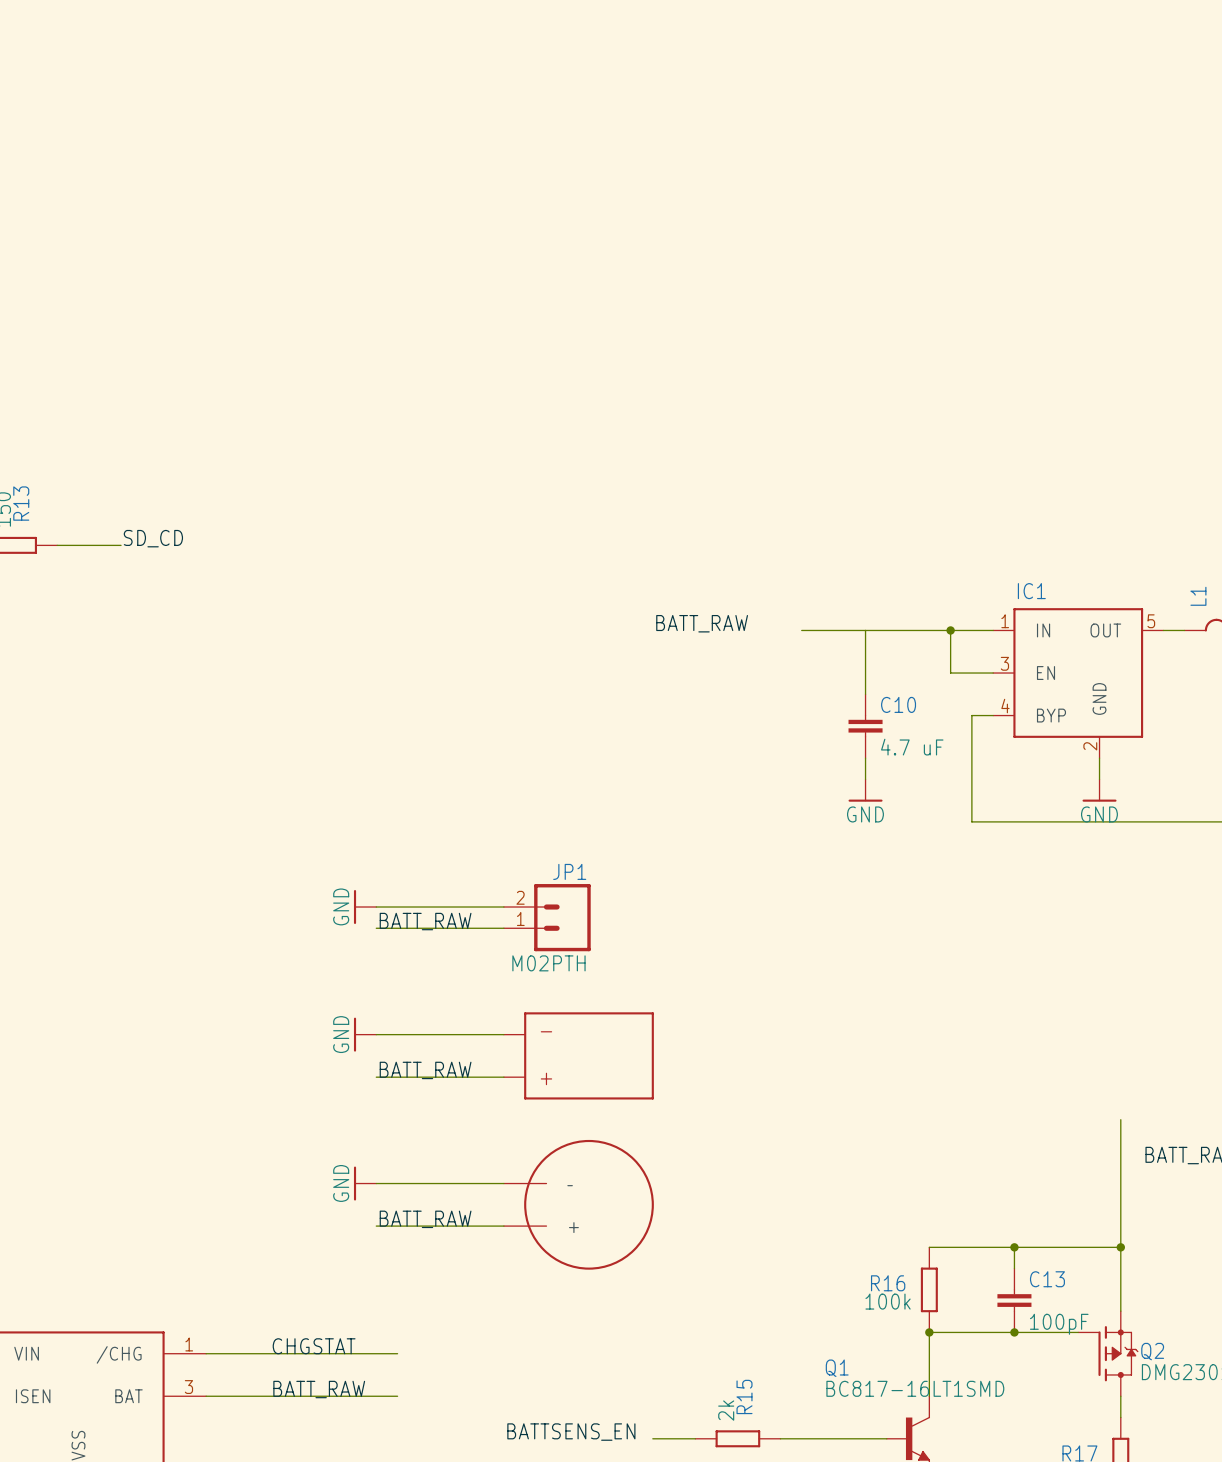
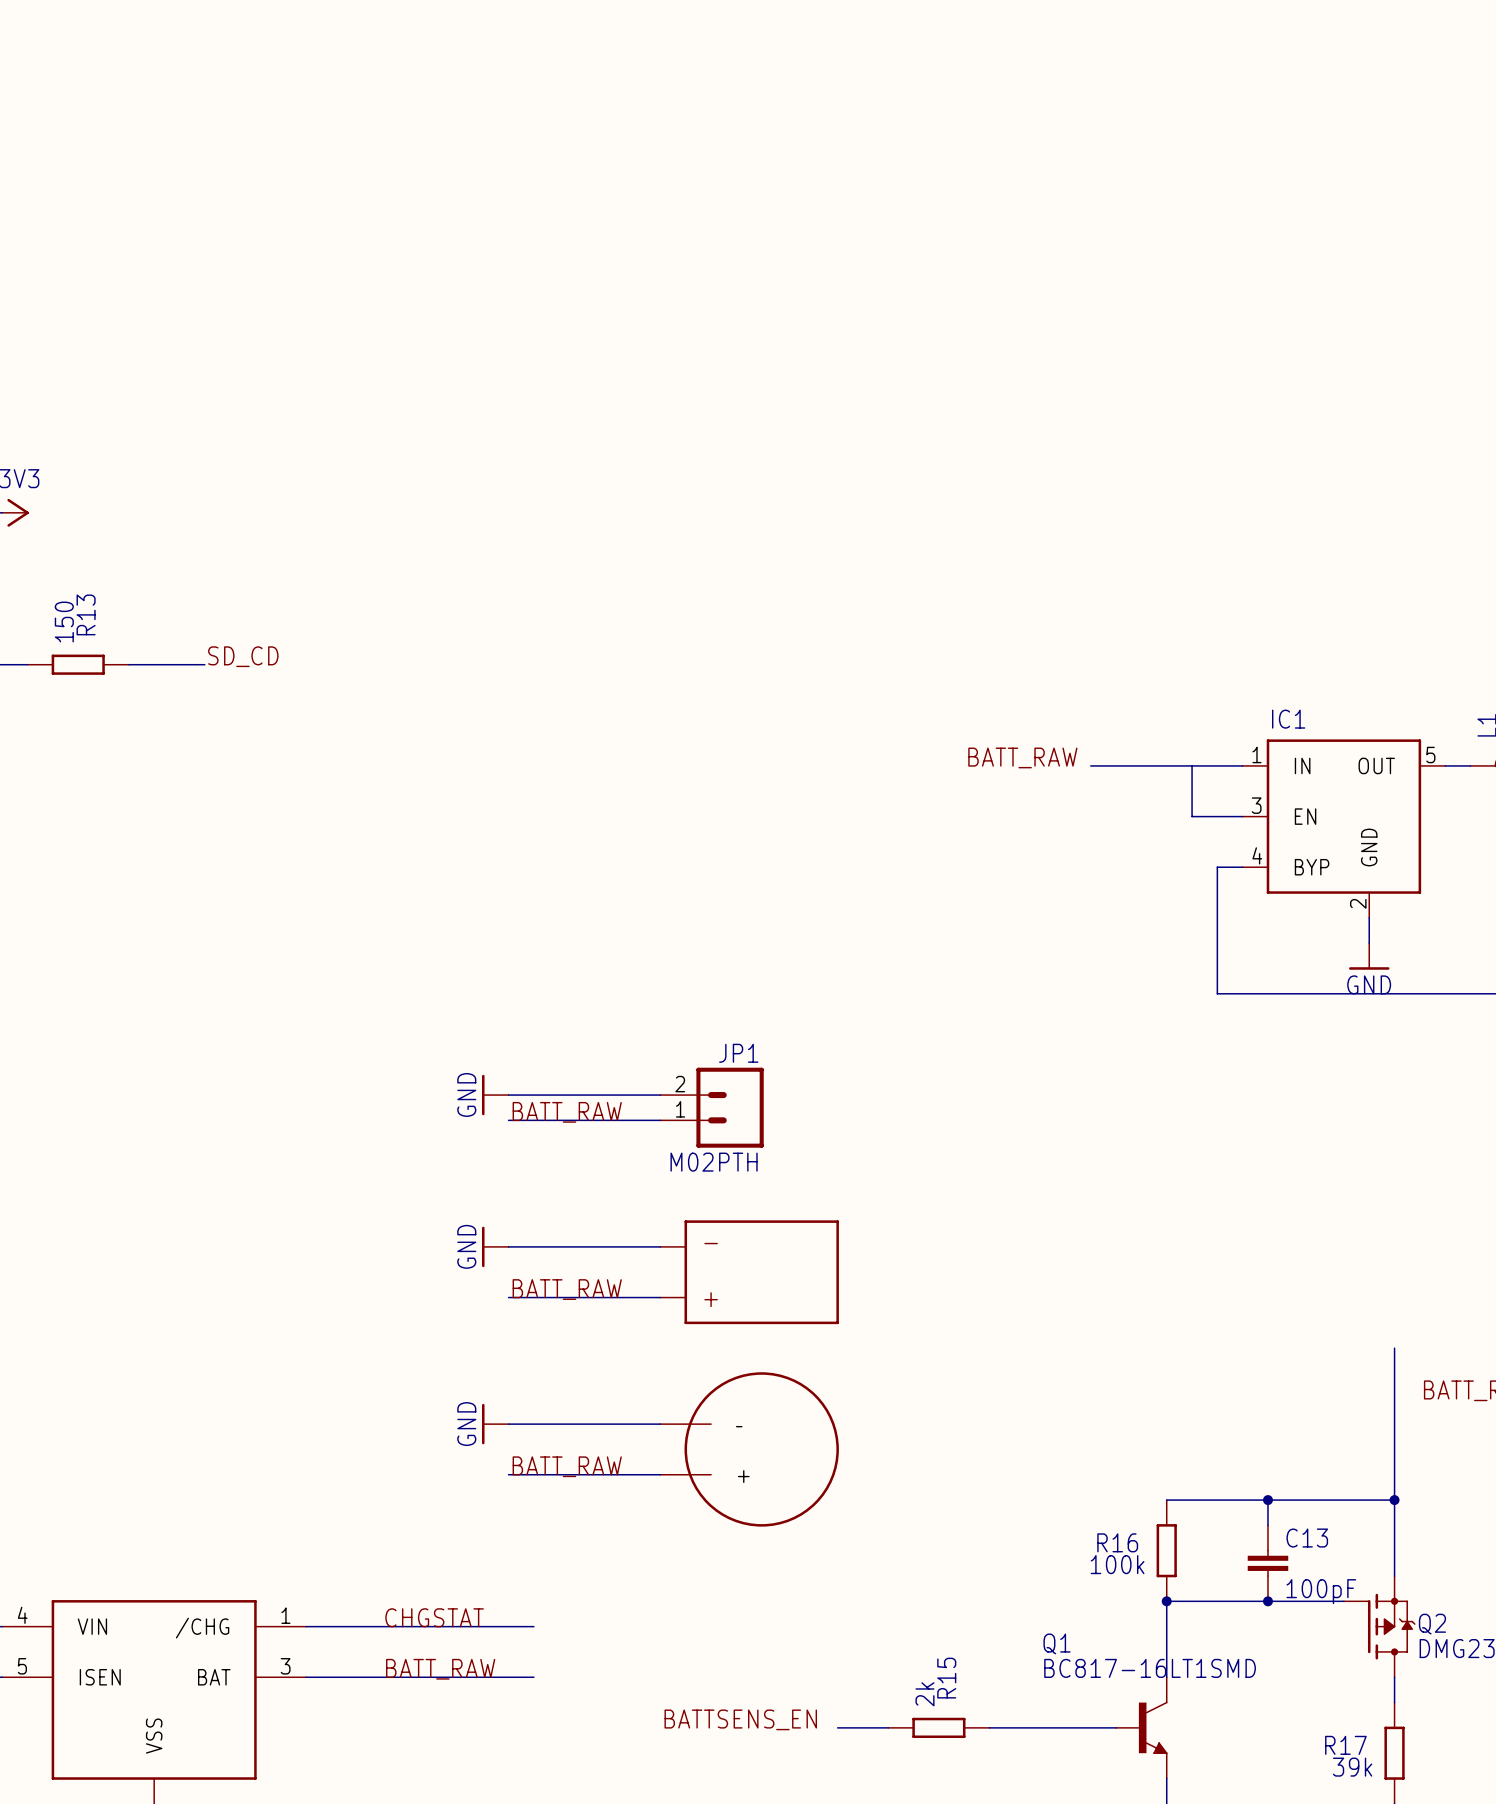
label position: BATT_RAW (702, 623) -> BATT_RAW (1022, 757)
wire: (801, 630) (865, 630) (865, 694) -> none
junction: (950, 630) -> none
C10: 4.7 uF (865, 726) -> none
wire: (865, 758) (865, 779) -> none
power symbol: GND (865, 790) -> none

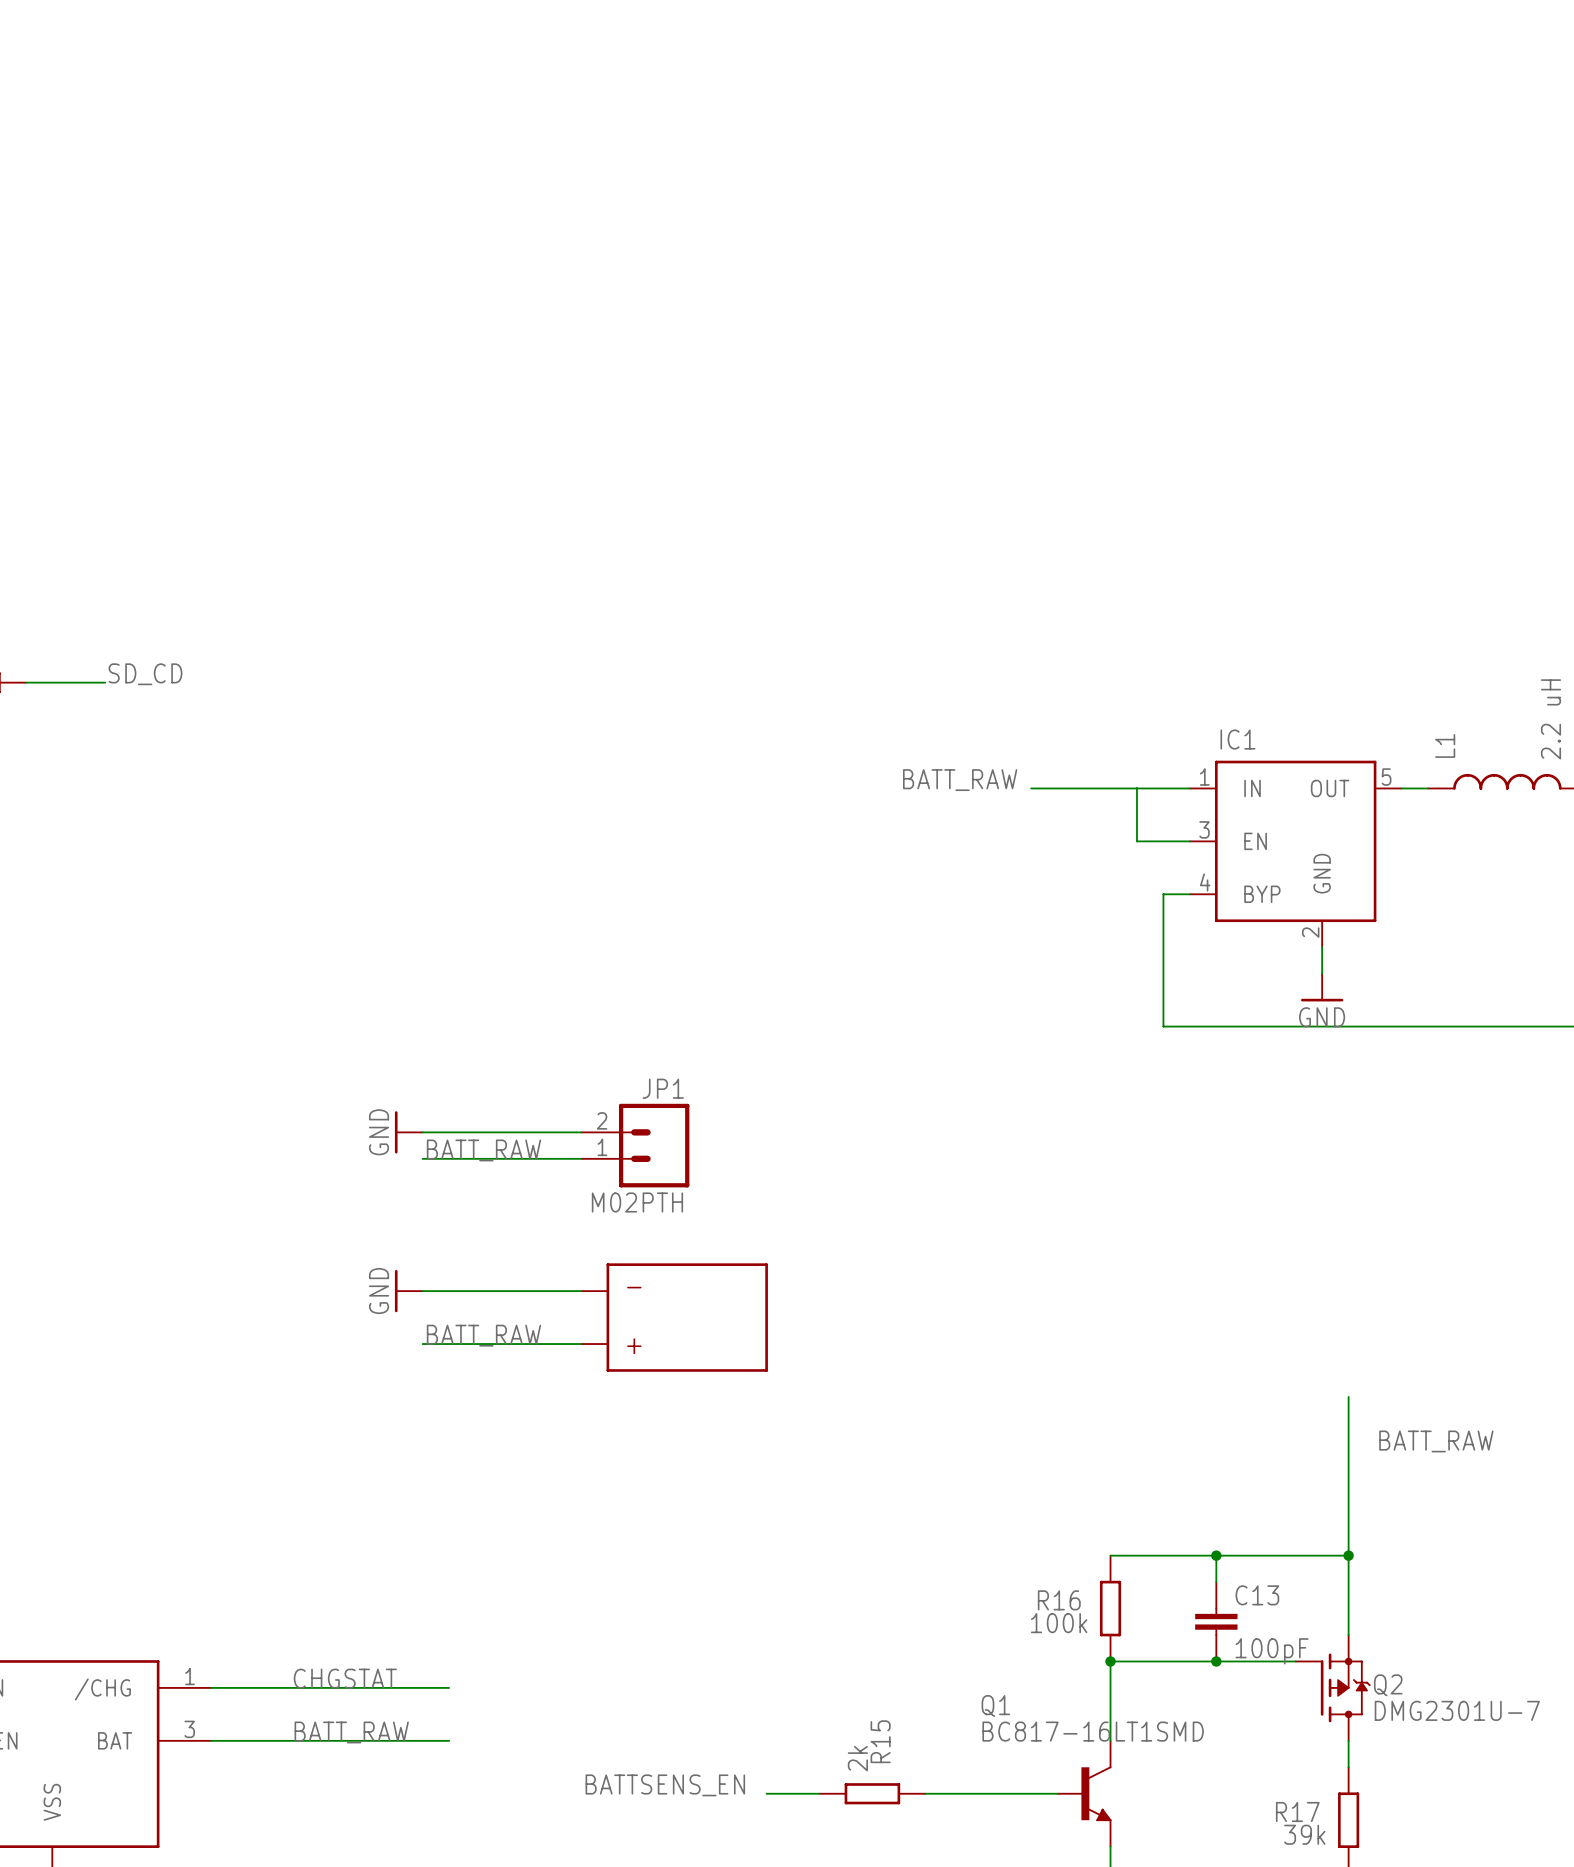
power symbol: GND (495, 1424) -> none
wire: (508, 1424) (660, 1424) -> none
part: (749, 1449) -> none
label: BATT_RAW (567, 1466) -> none
wire: (508, 1474) (660, 1474) -> none

